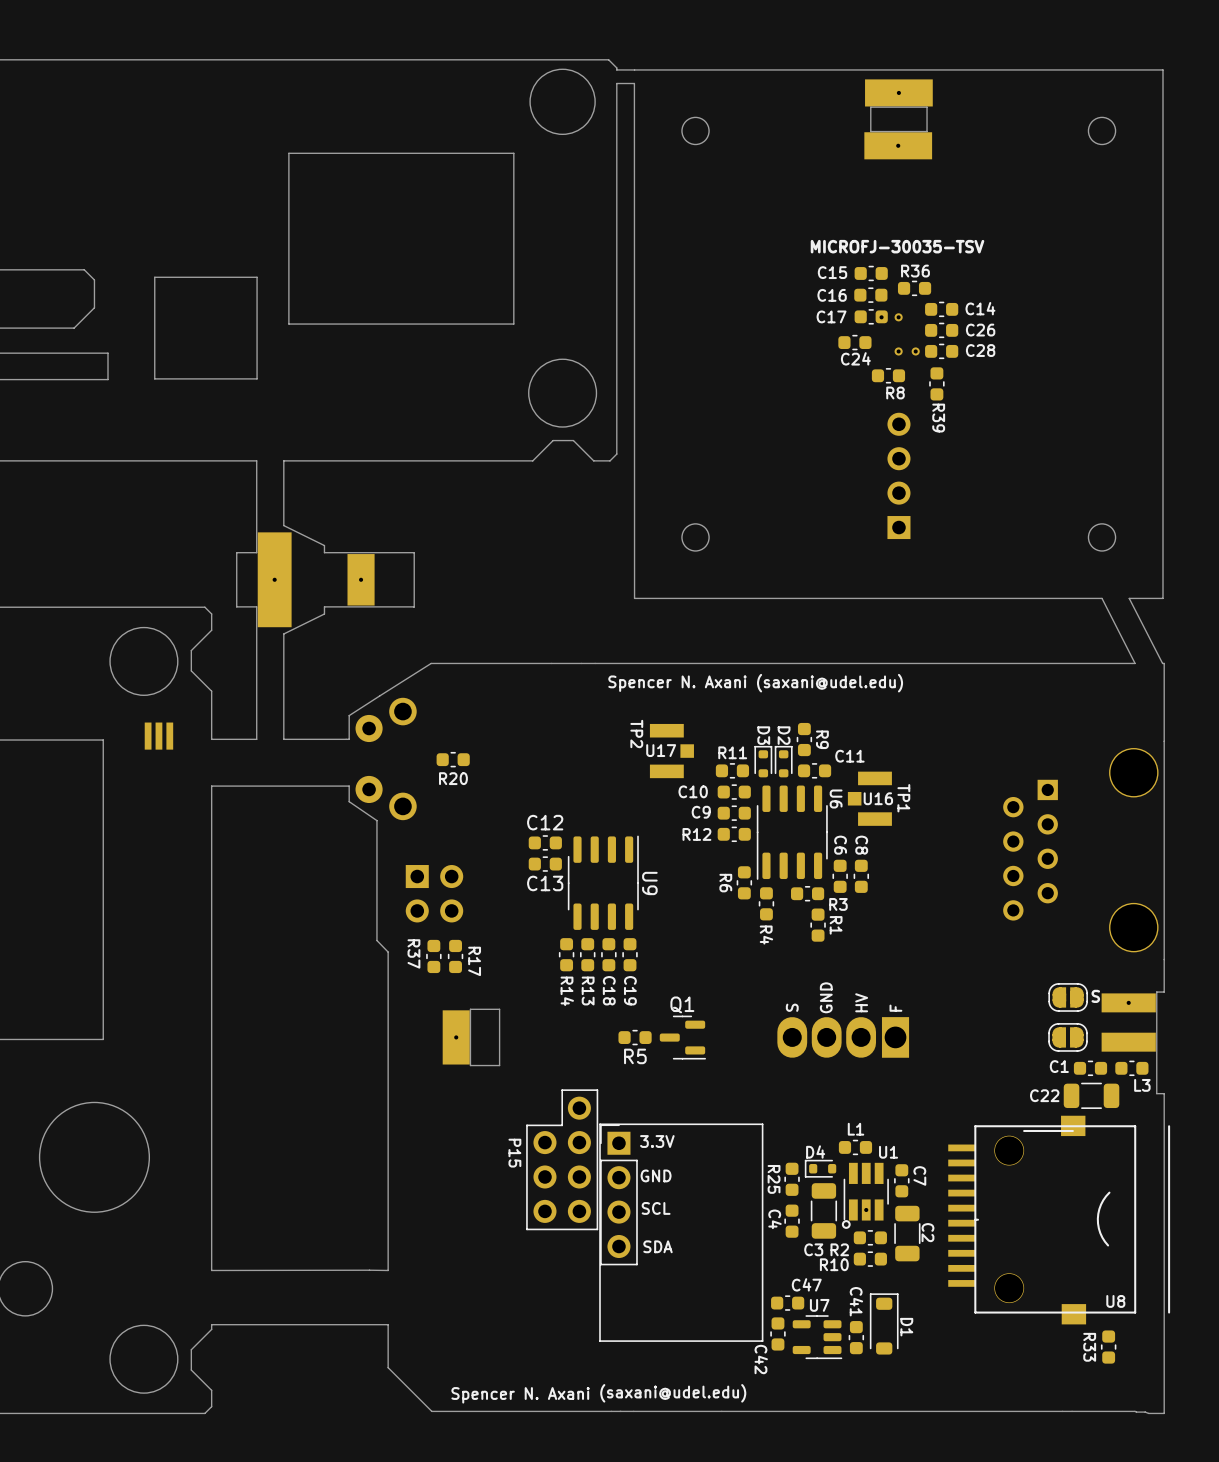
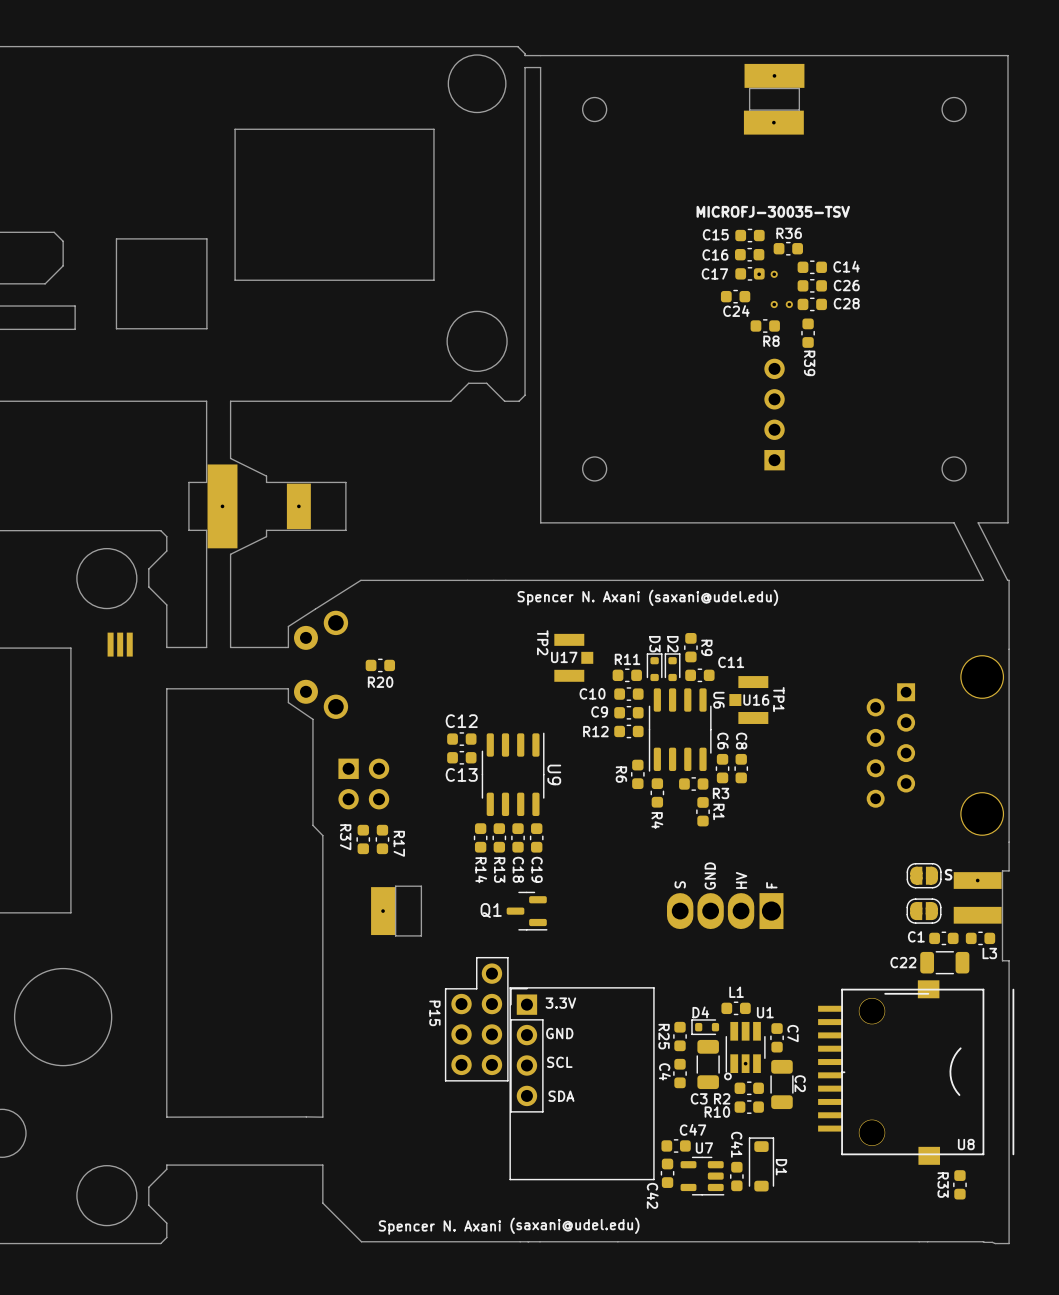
Q1 name position: Q1 (682, 1004) -> Q1 (491, 910)
R5: (635, 1037) -> none
Q1 position: (682, 1037) -> (527, 911)

